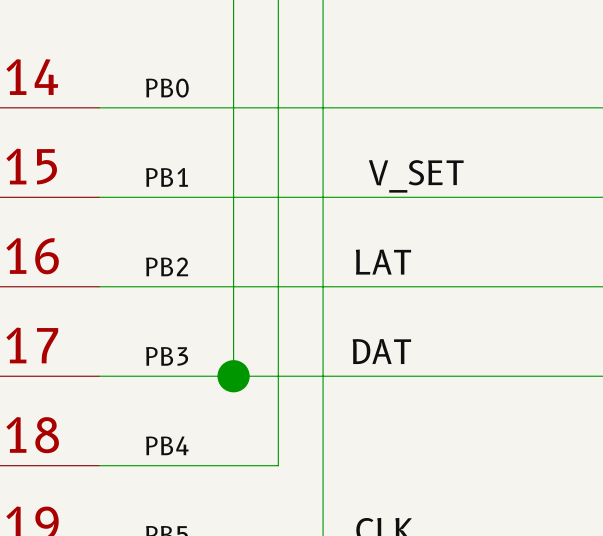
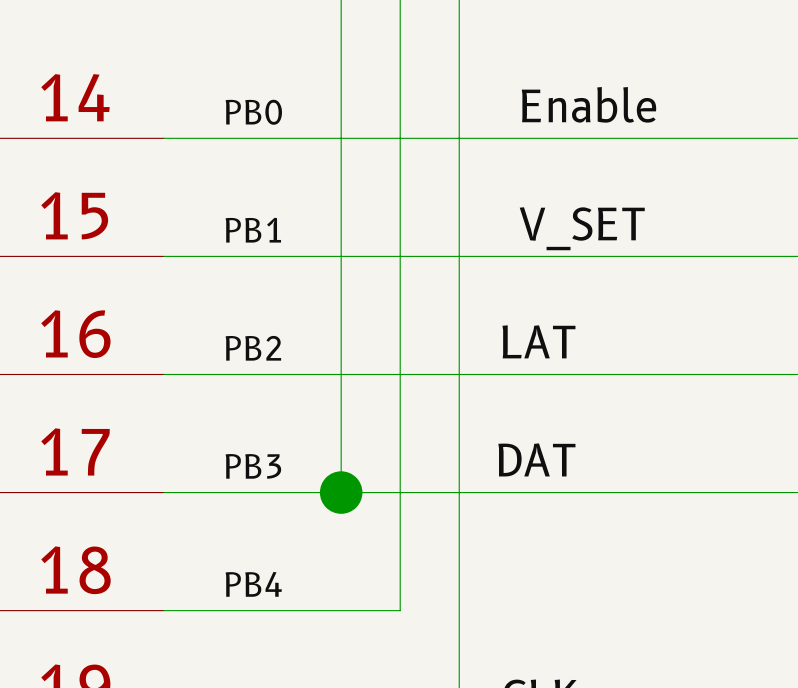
label: none -> Enable (588, 104)

